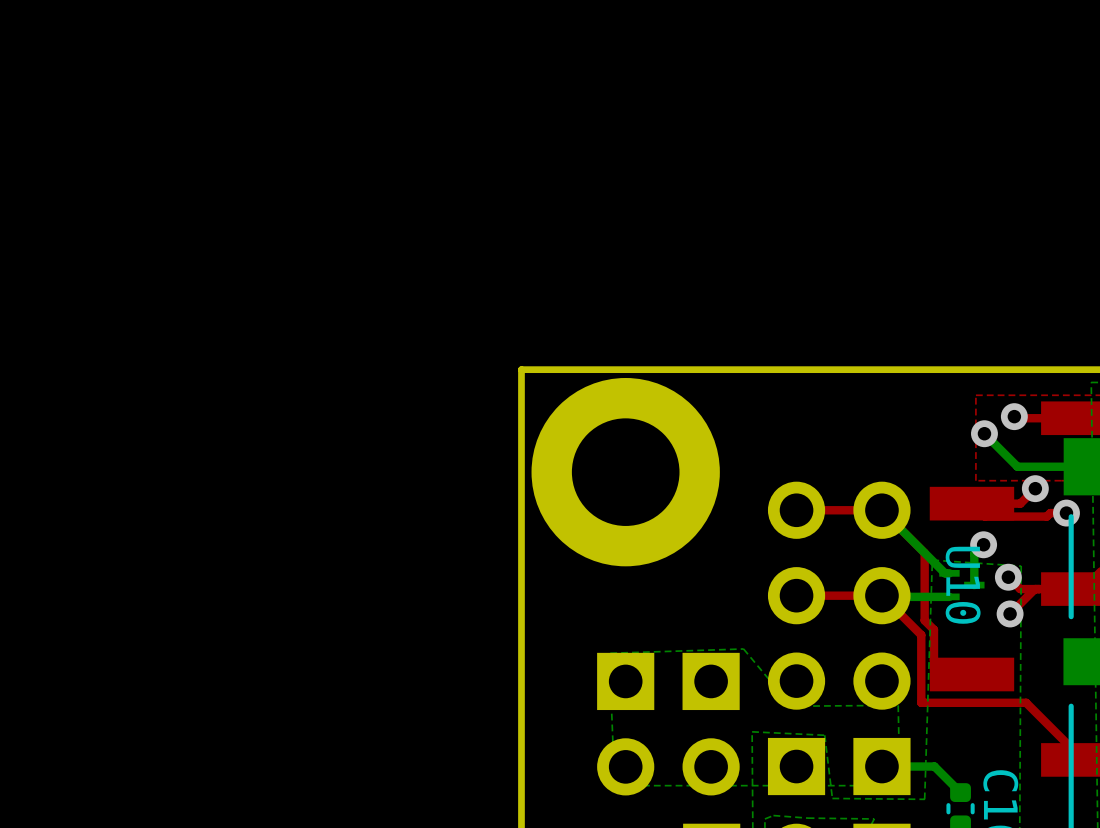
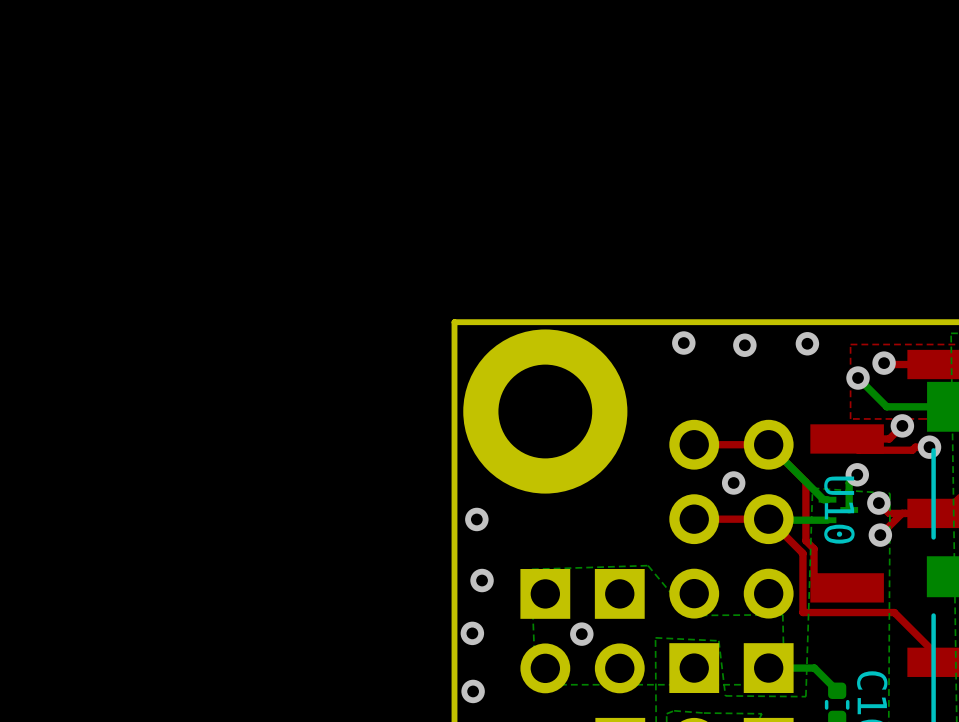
via: none -> (683, 343)
via: none -> (807, 343)
via: none -> (744, 345)
via: none -> (733, 482)
via: none -> (476, 519)
via: none -> (482, 580)
via: none -> (472, 633)
via: none -> (581, 634)
via: none -> (473, 691)

